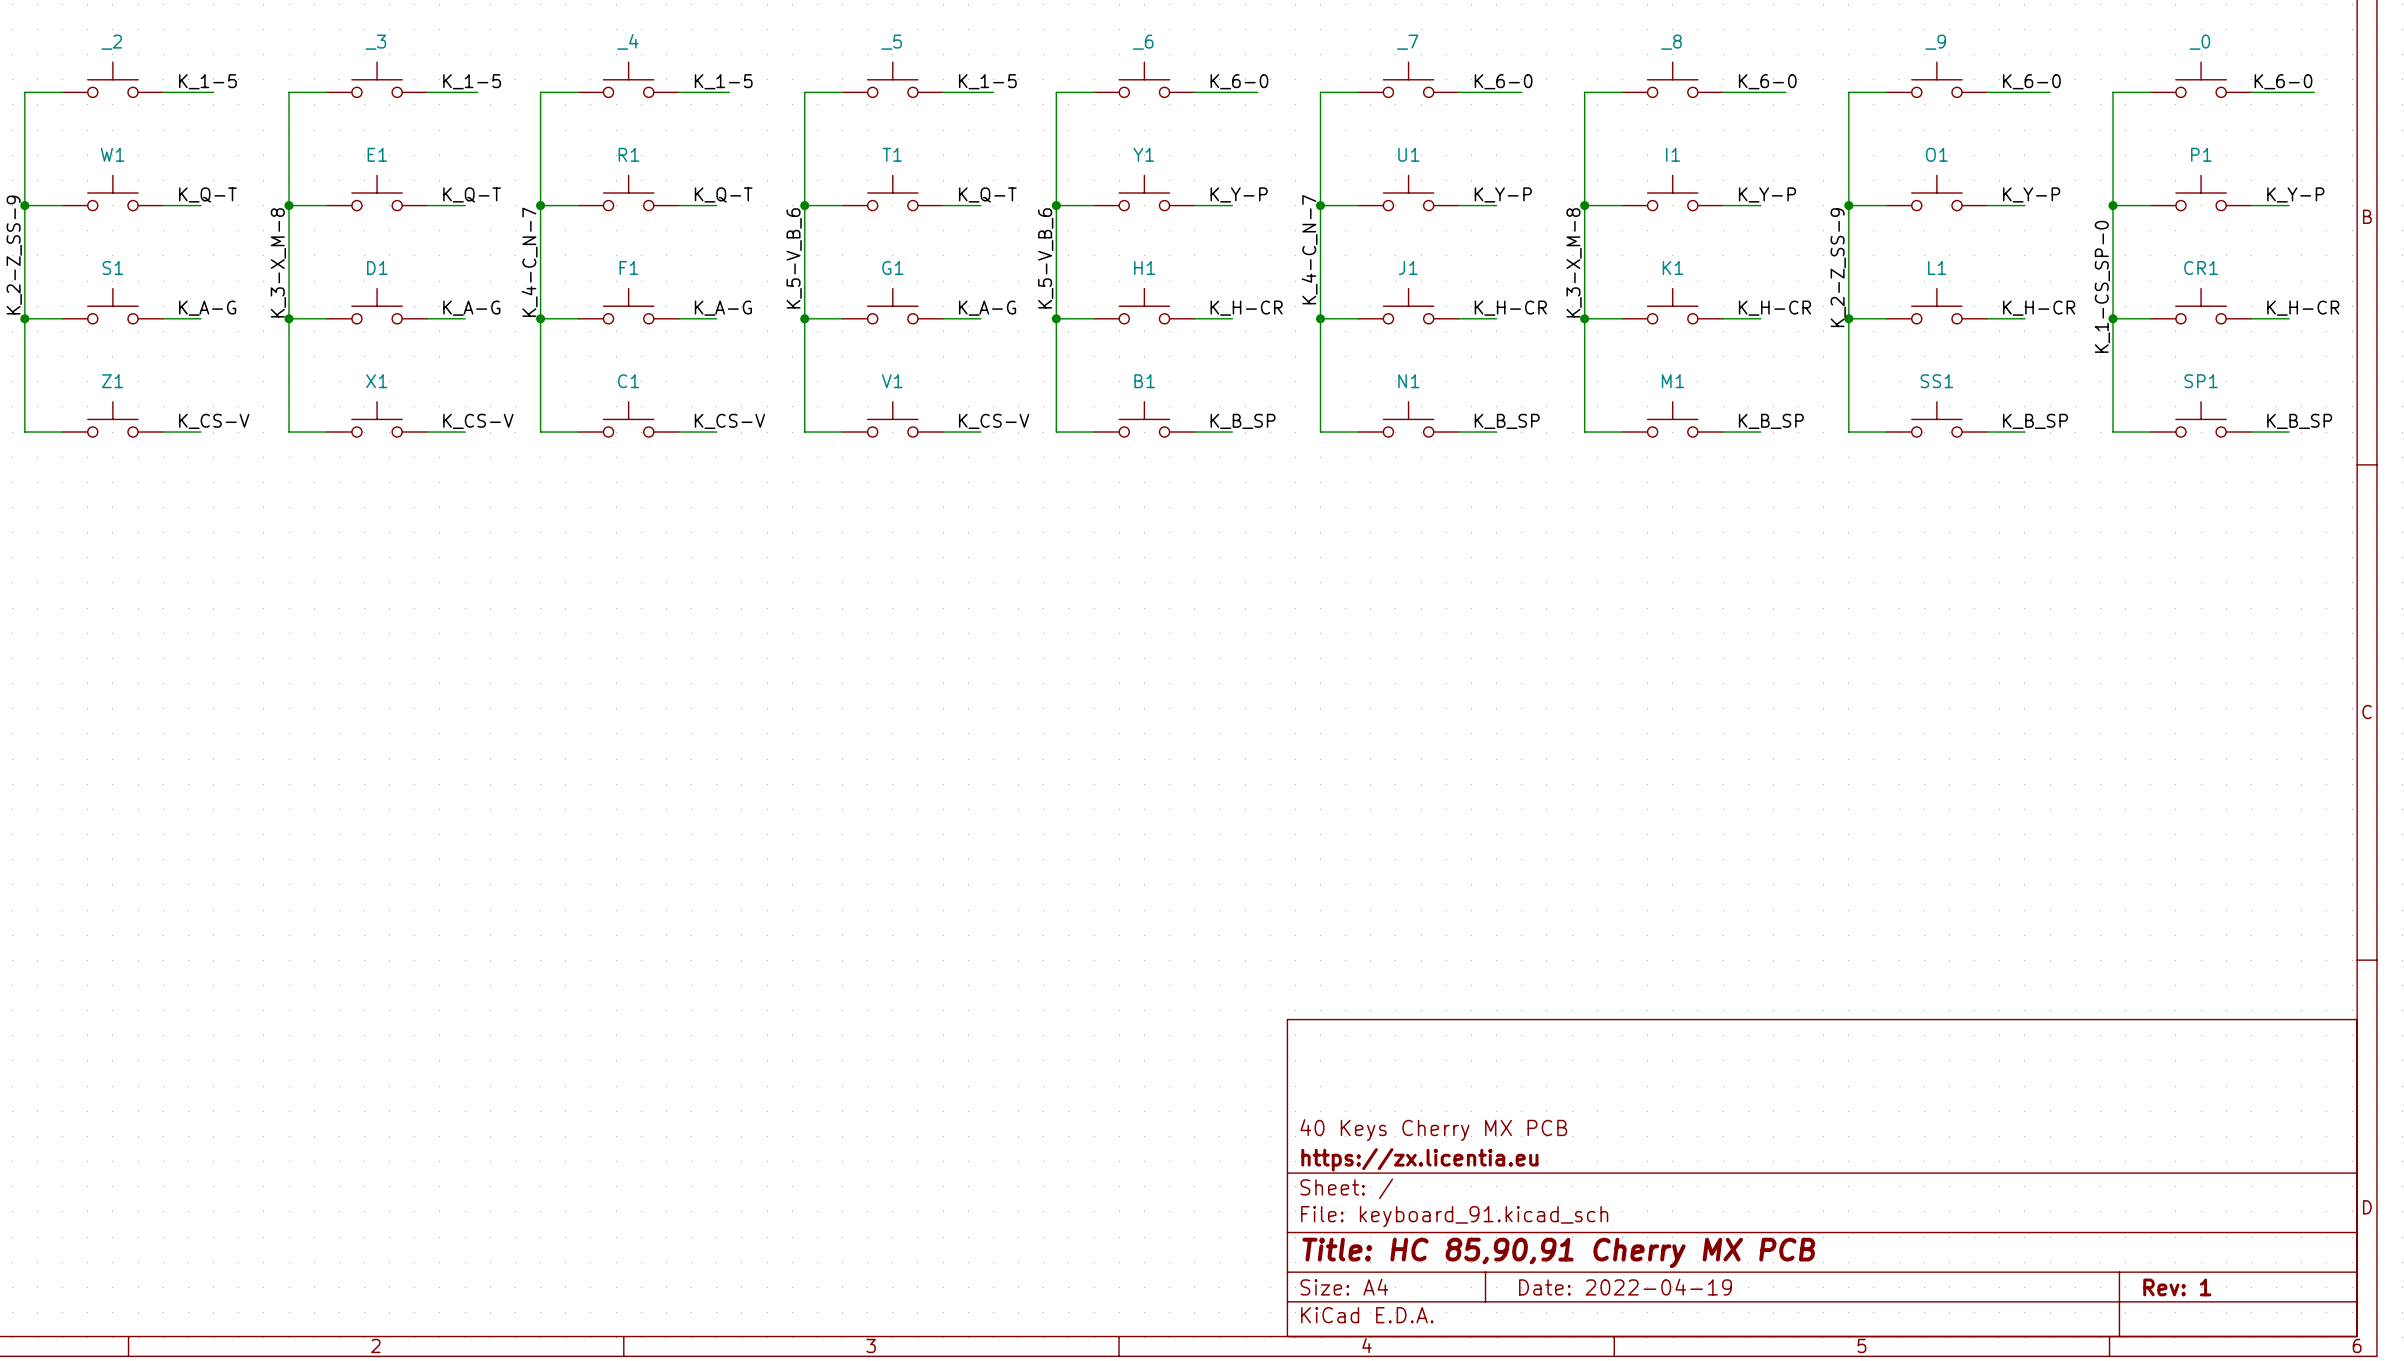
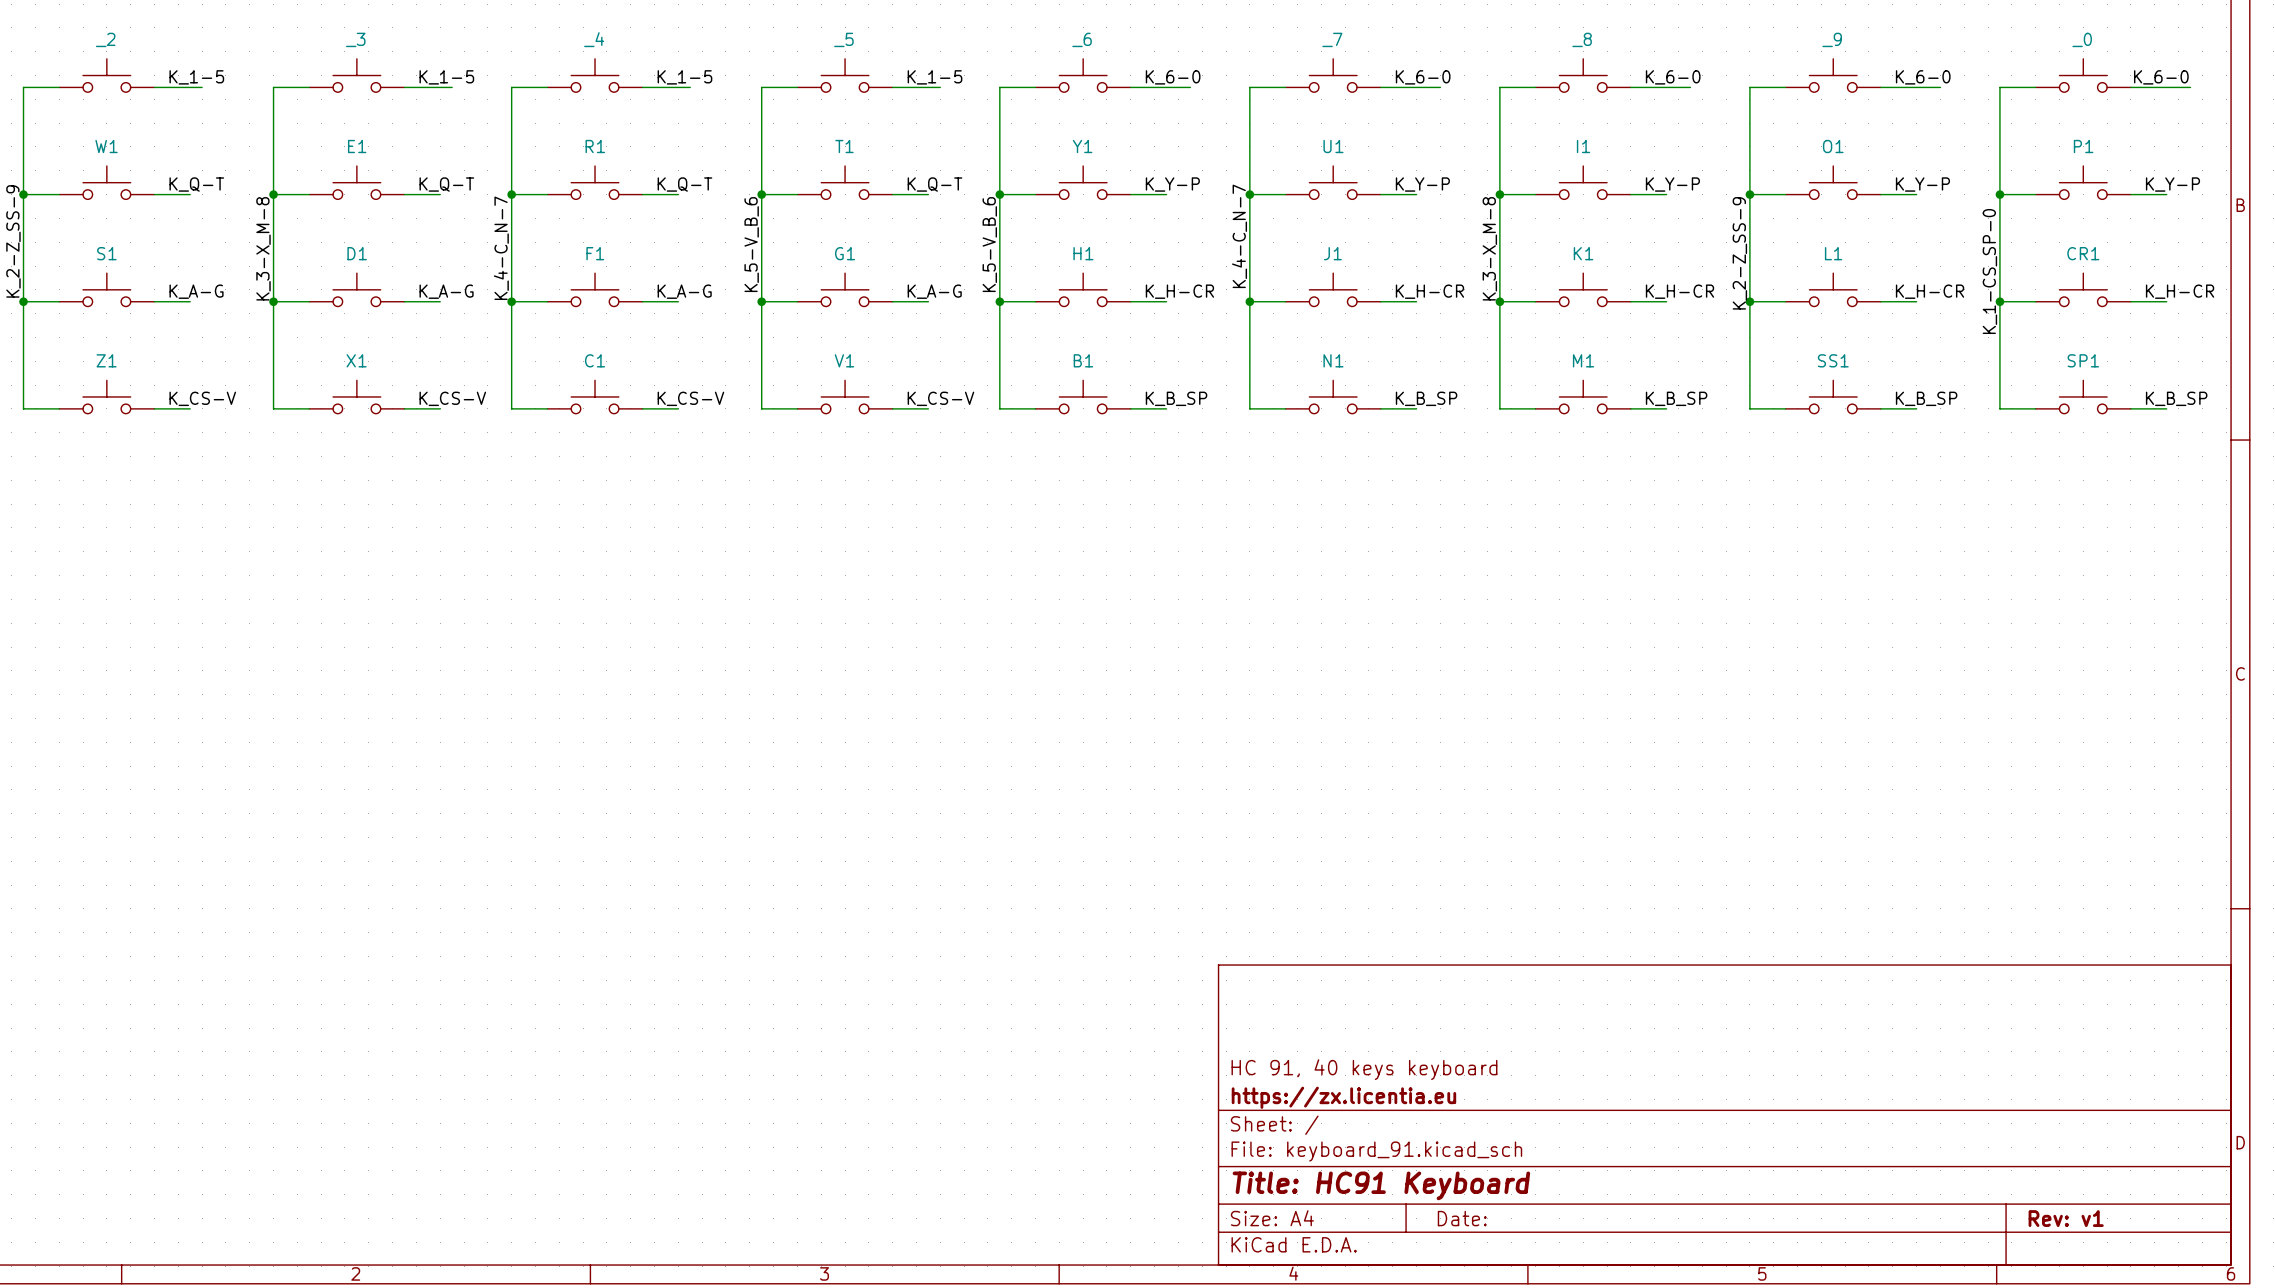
title block: 40 Keys Cherry MX PCB (1433, 1130) -> HC 91, 40 keys keyboard (1364, 1069)
title block: Title: HC 85,90,91 Cherry MX PCB (1558, 1252) -> Title: HC91 Keyboard (1381, 1185)
title block: Date: 2022-04-19 (1625, 1287) -> Date: (1462, 1218)
title block: Rev: 1 (2177, 1287) -> Rev: v1 (2066, 1218)

